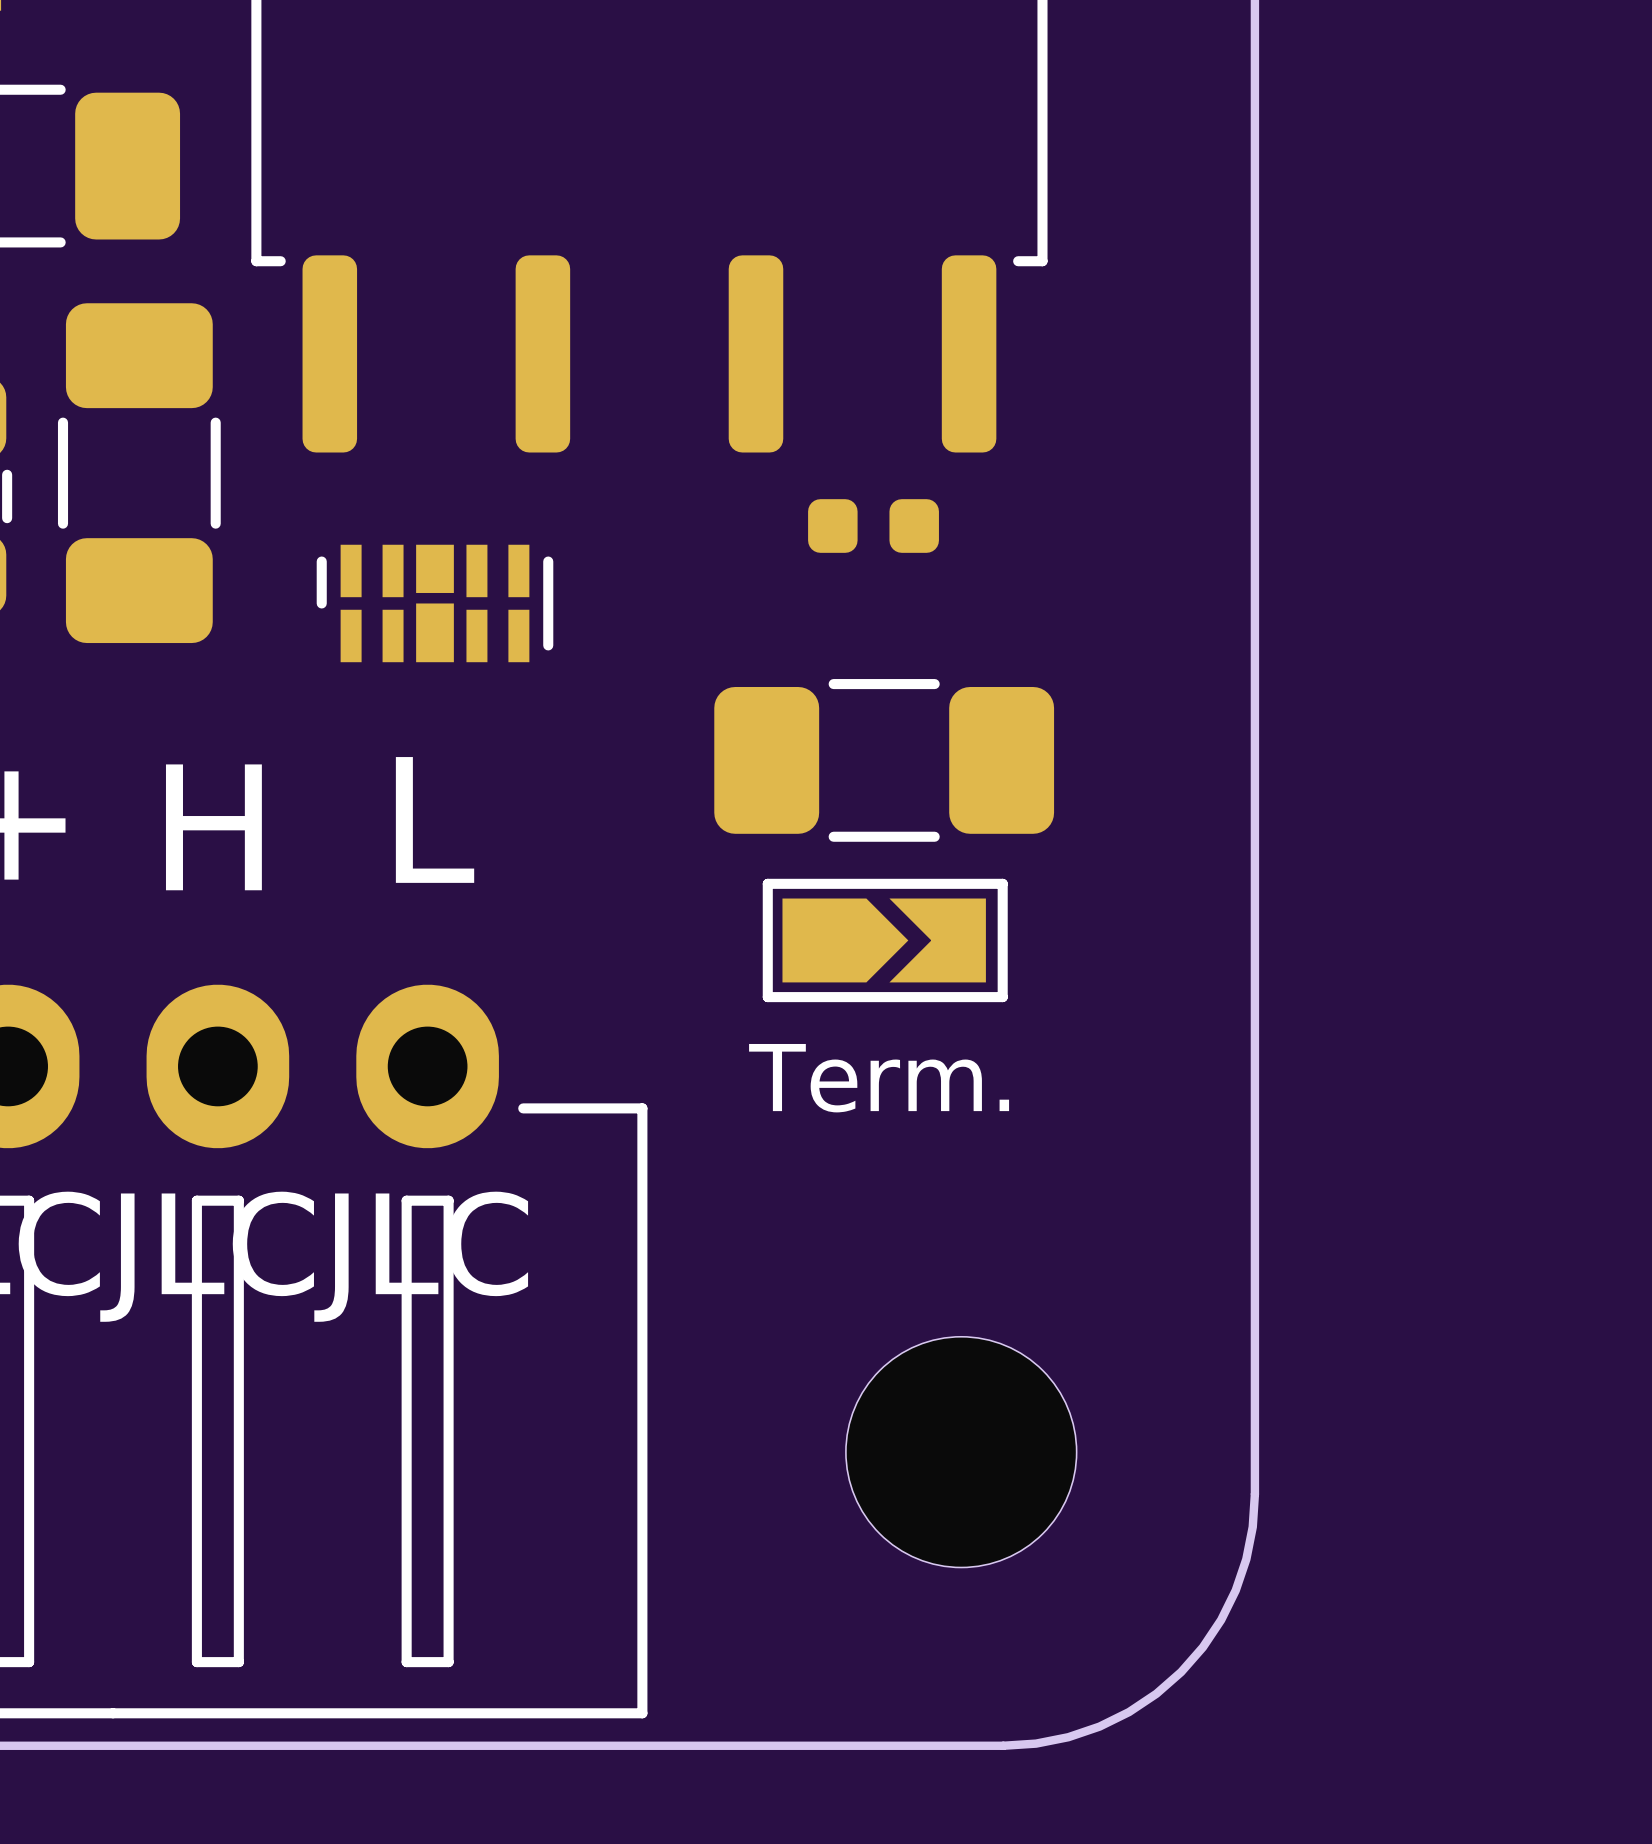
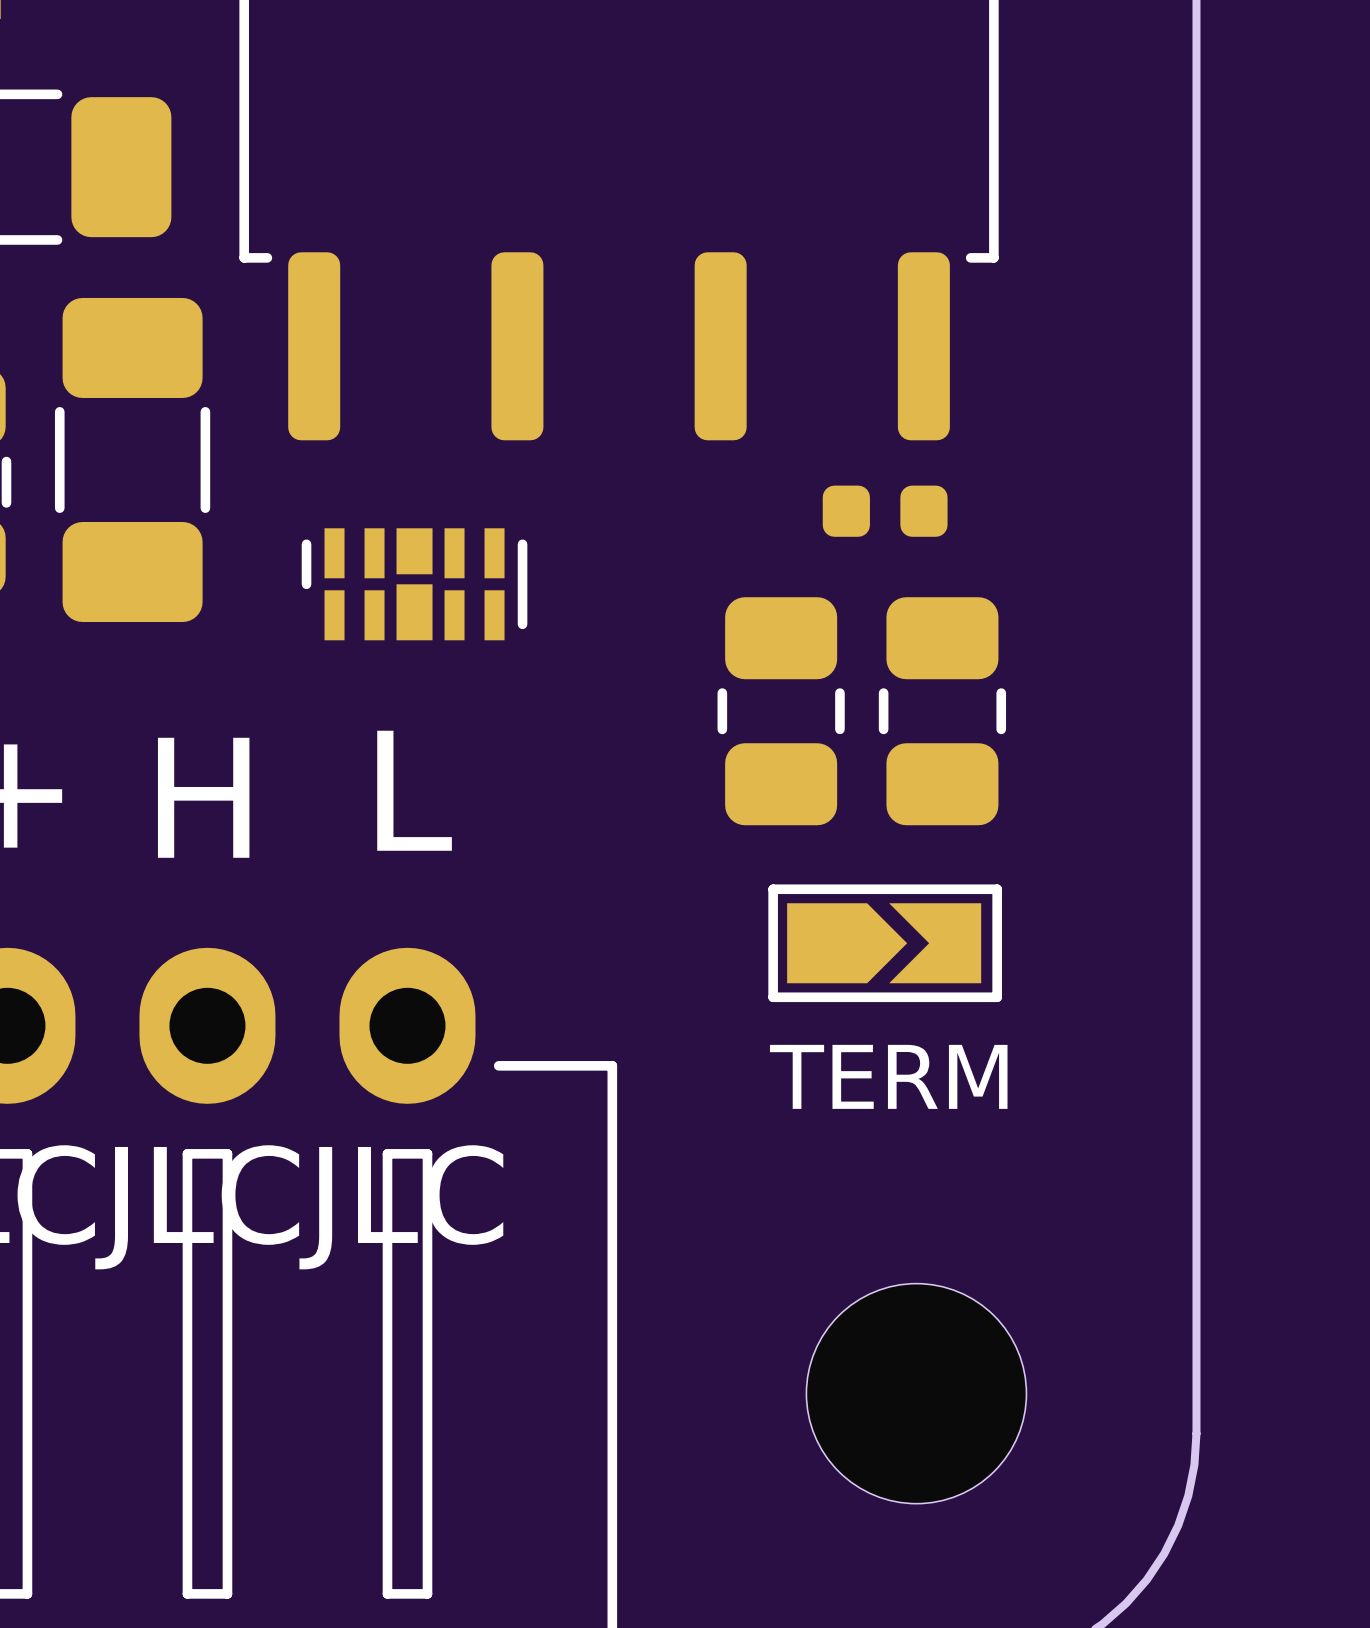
part position: (873, 526) -> (885, 511)
part: none -> (781, 711)
part: none -> (942, 711)
part: (884, 760) -> none
part position: (885, 940) -> (885, 943)
text: Term. (879, 1078) -> TERM (888, 1076)

